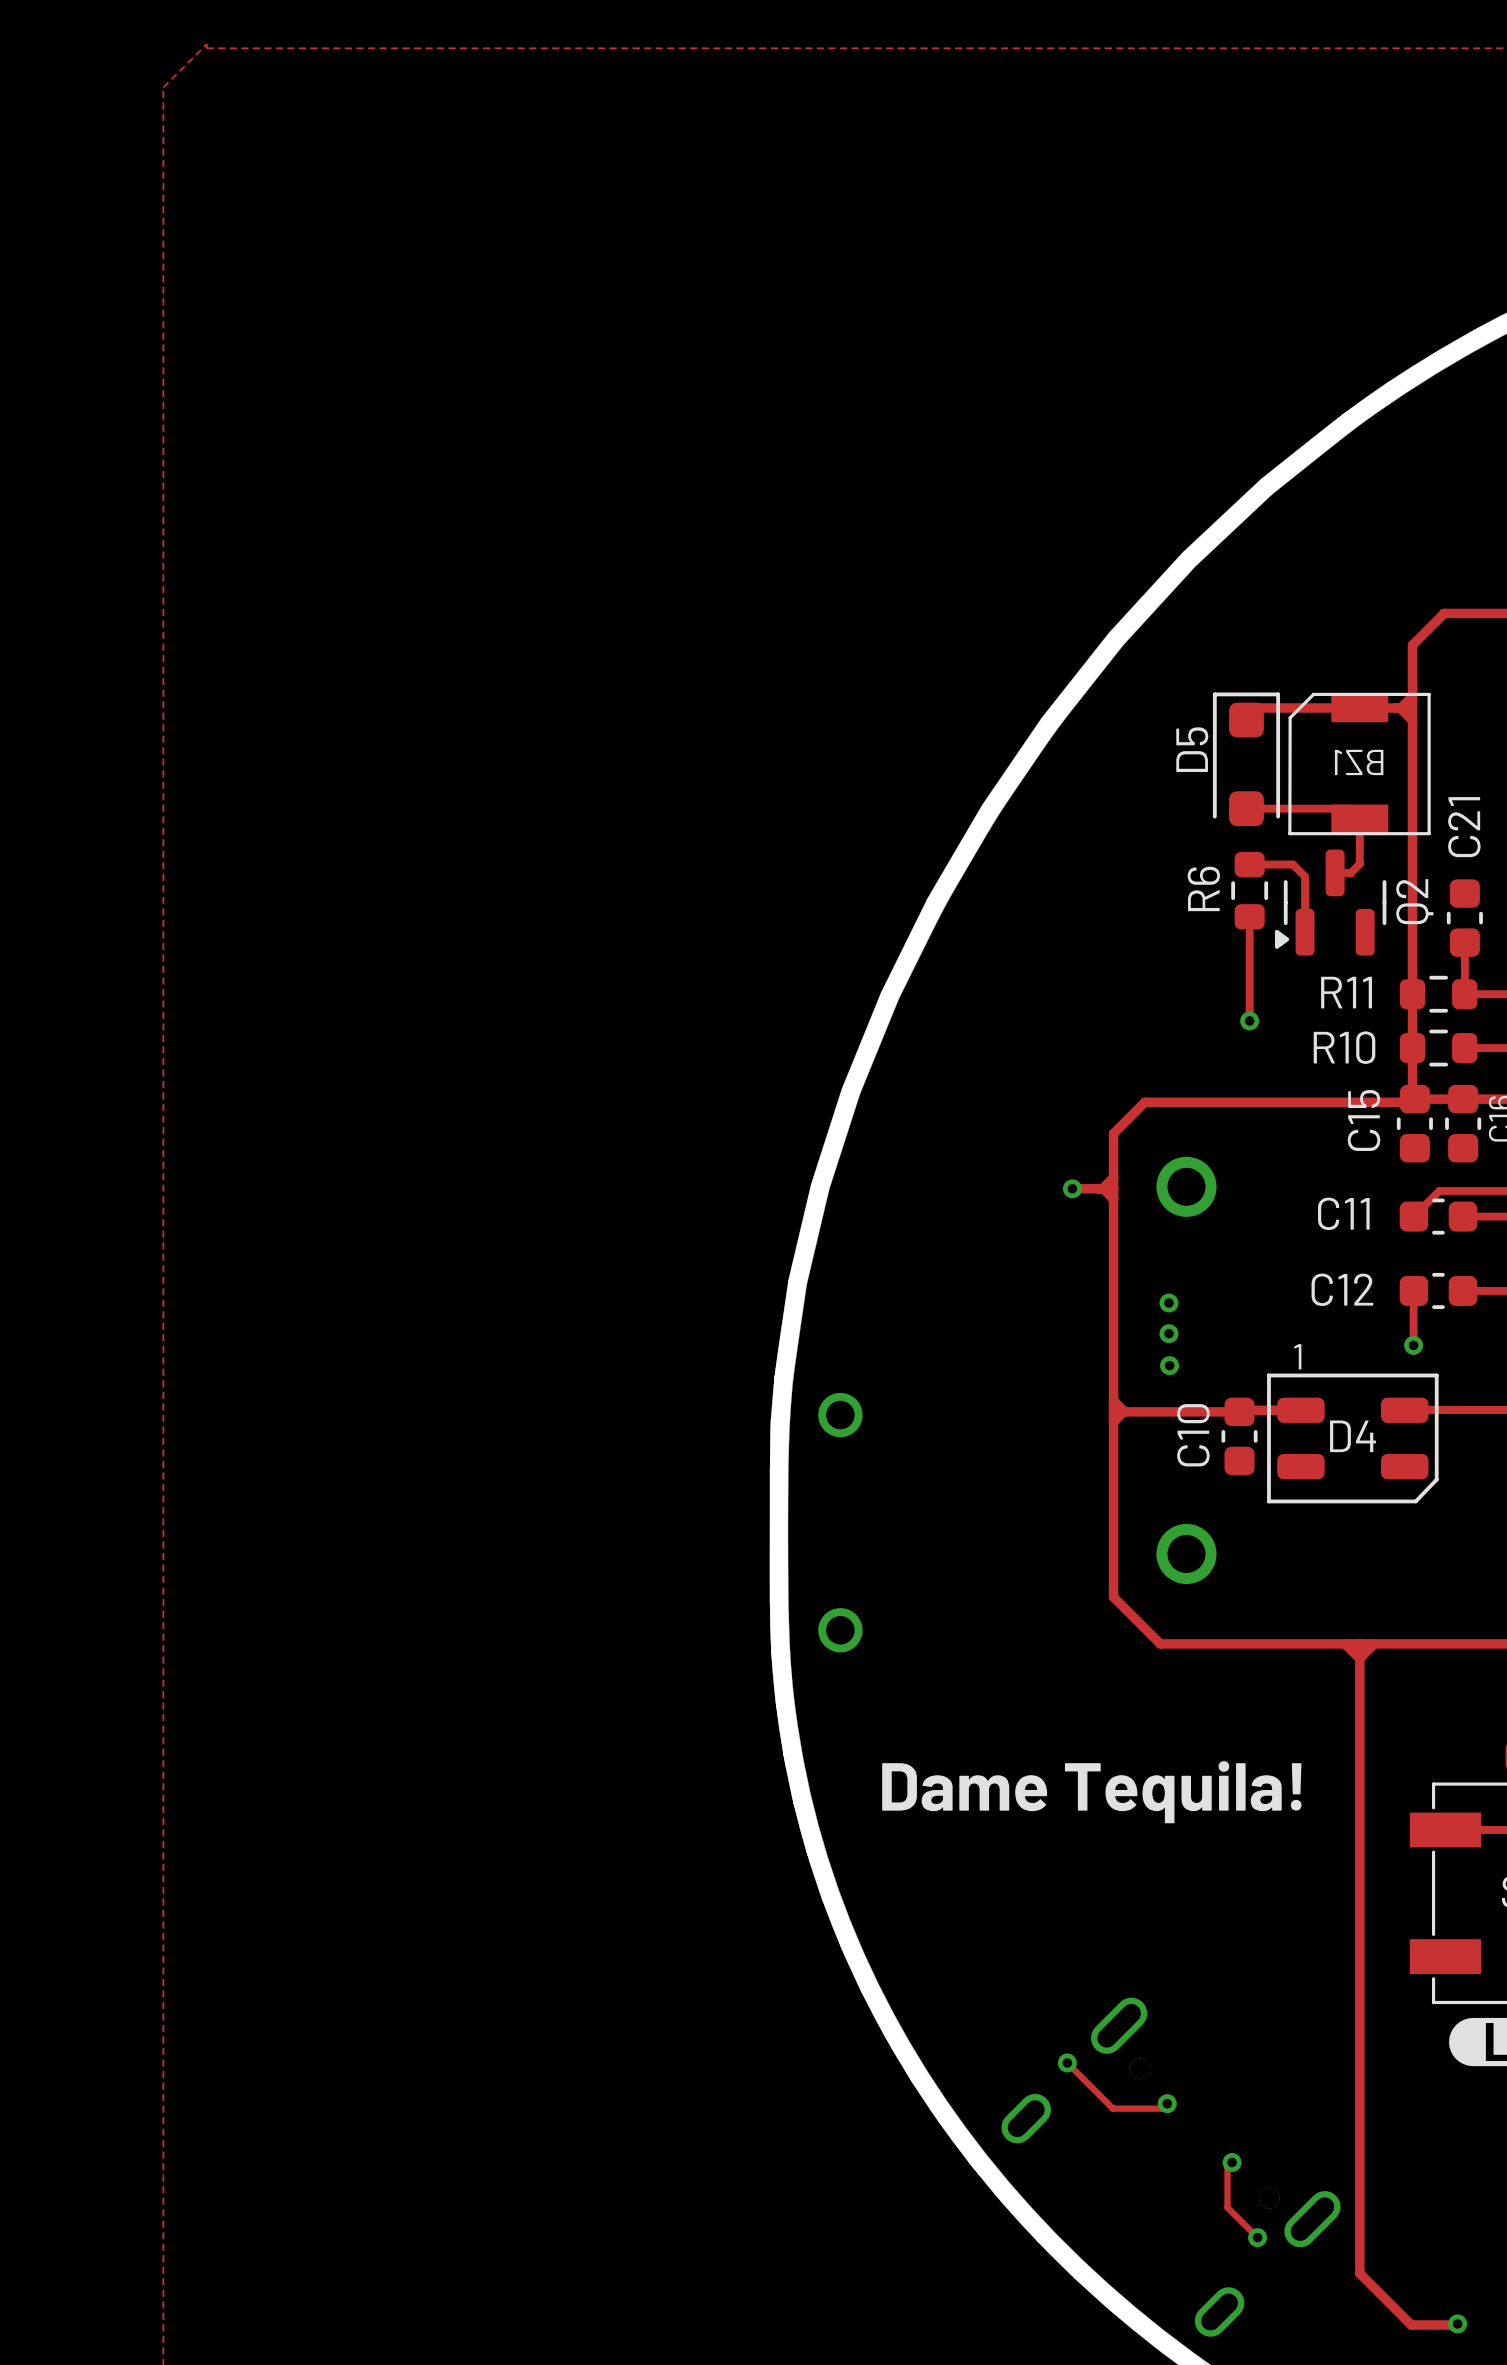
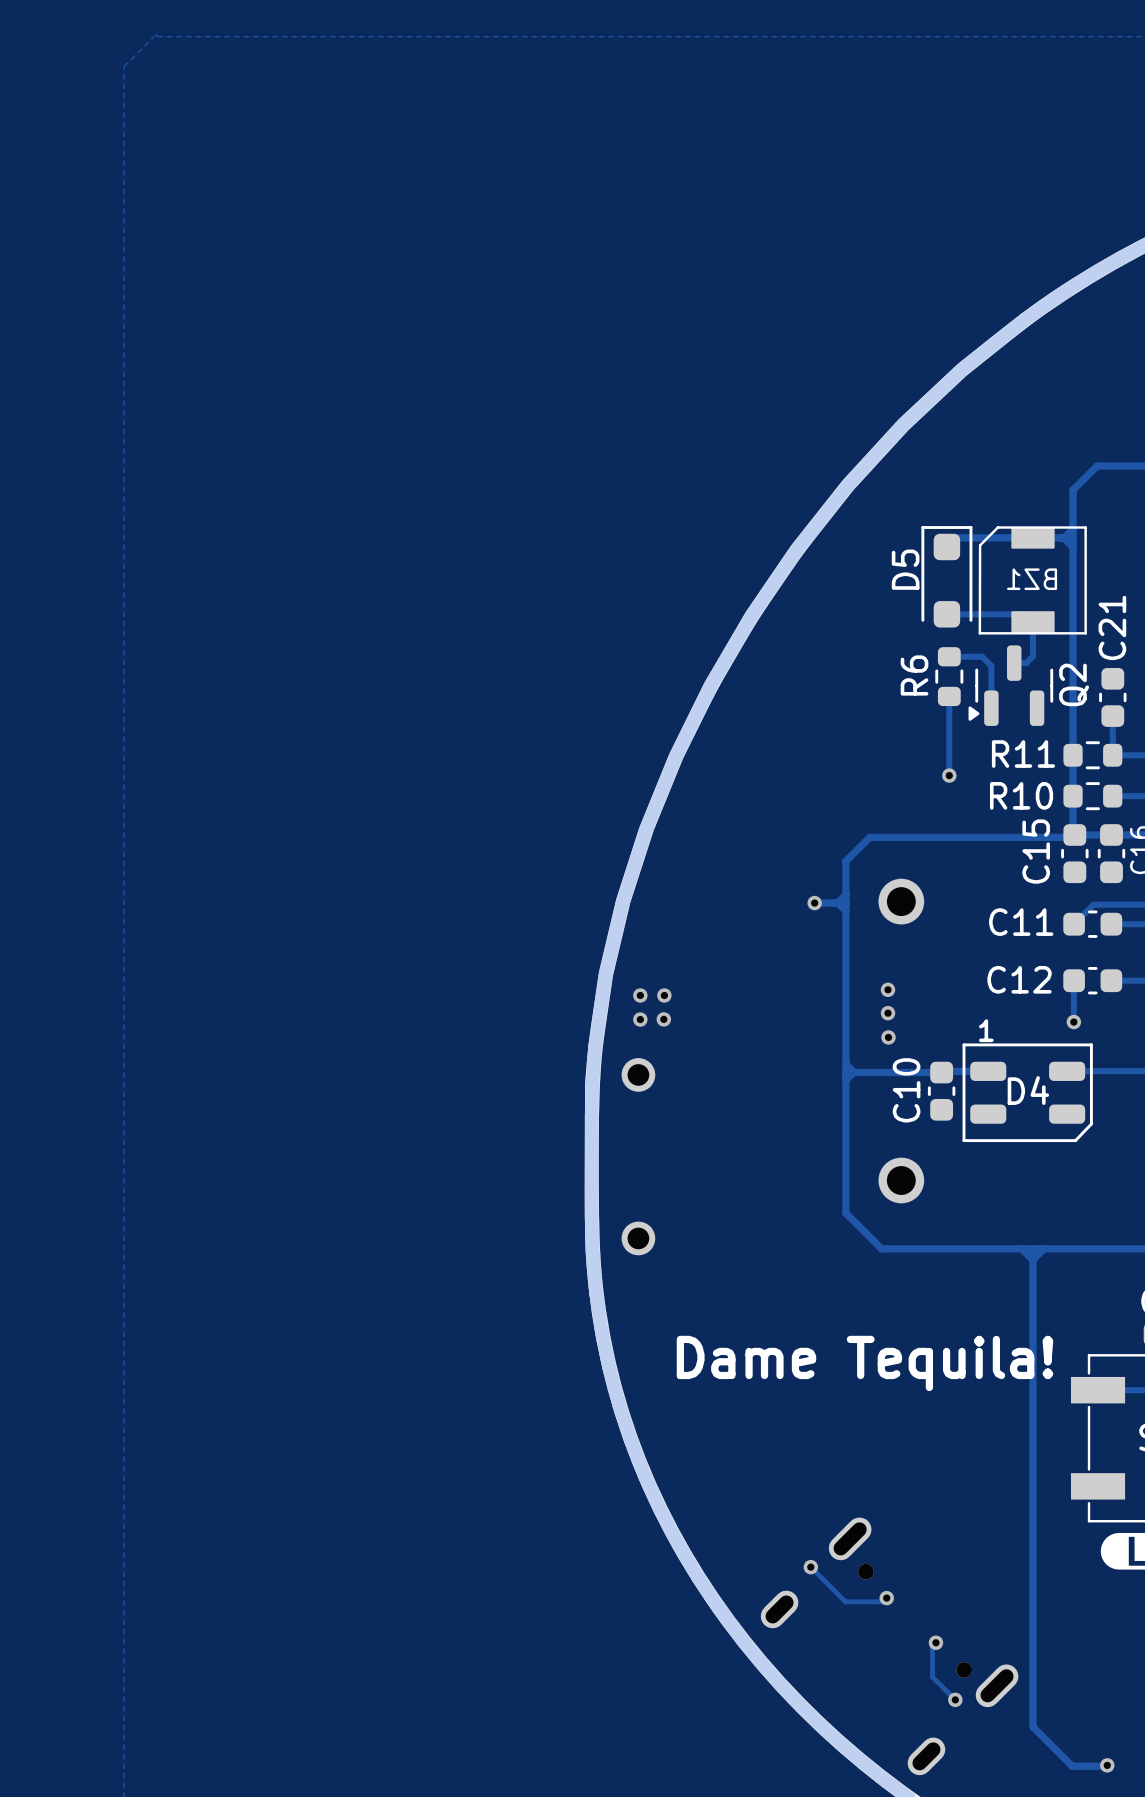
via: none -> (640, 995)
via: none -> (664, 995)
via: none -> (663, 1019)
via: none -> (640, 1019)

